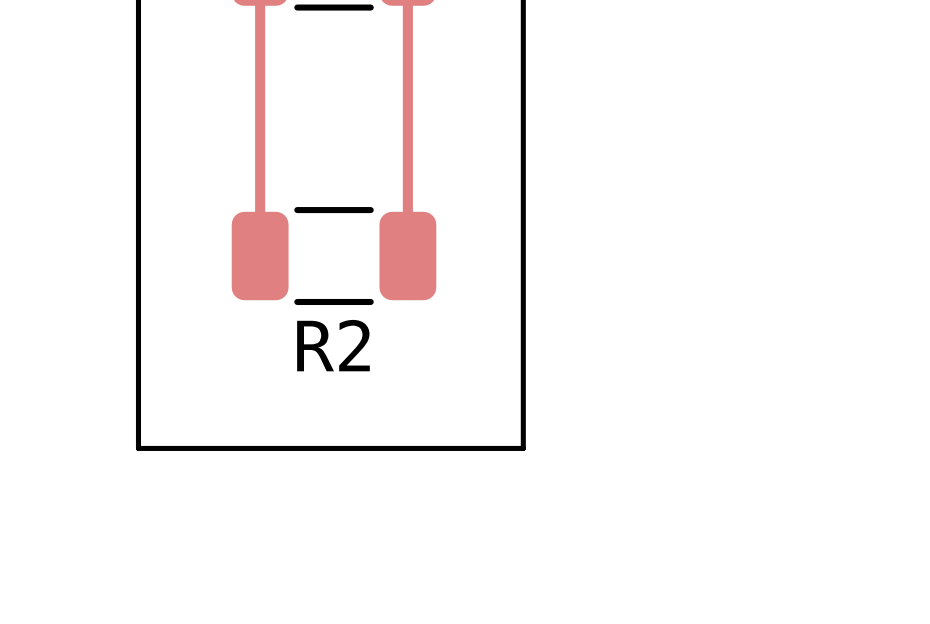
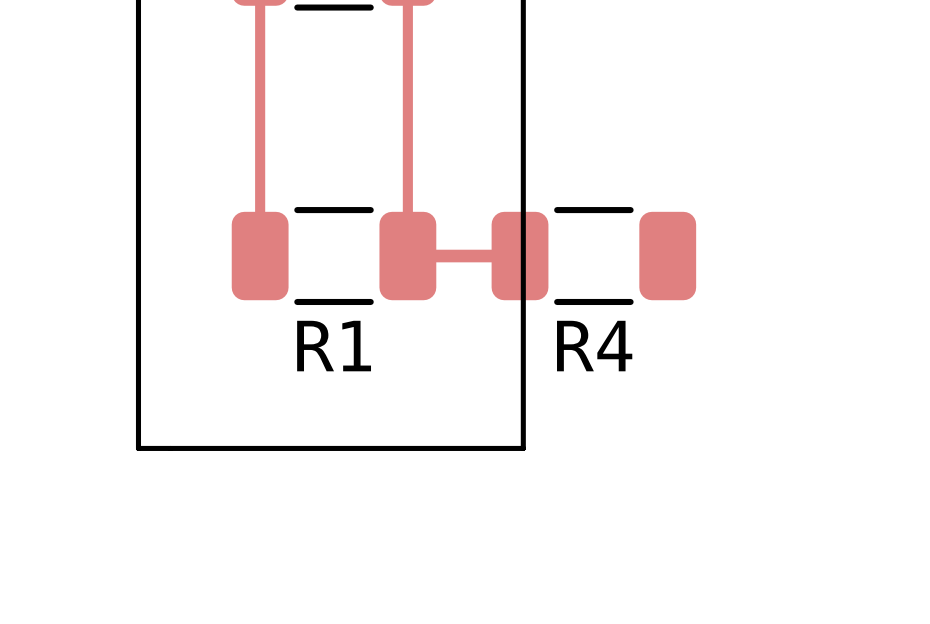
top track: none -> (402, 256) (520, 256)
R4: none -> (593, 256)
R2 name: R2 (333, 345) -> R1 (334, 346)

